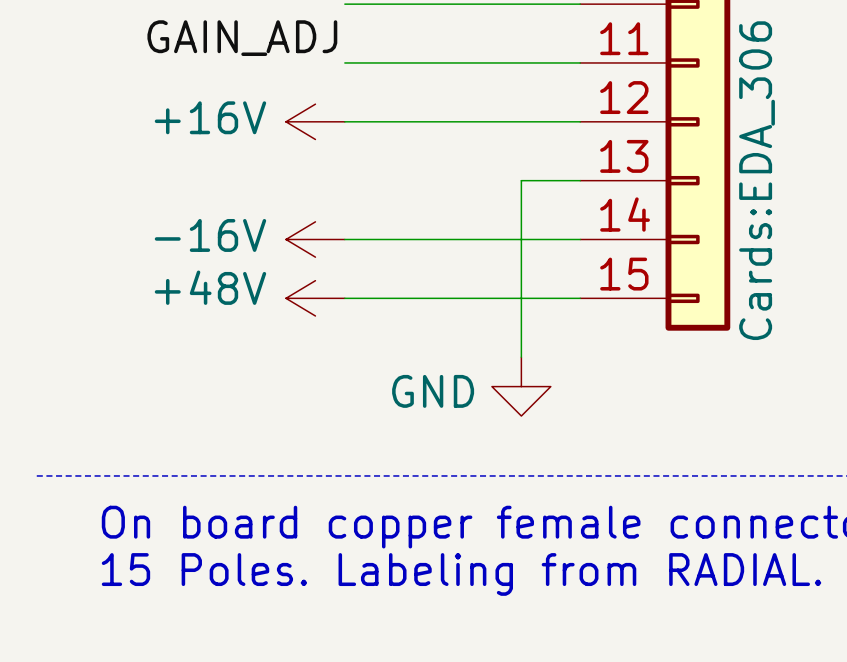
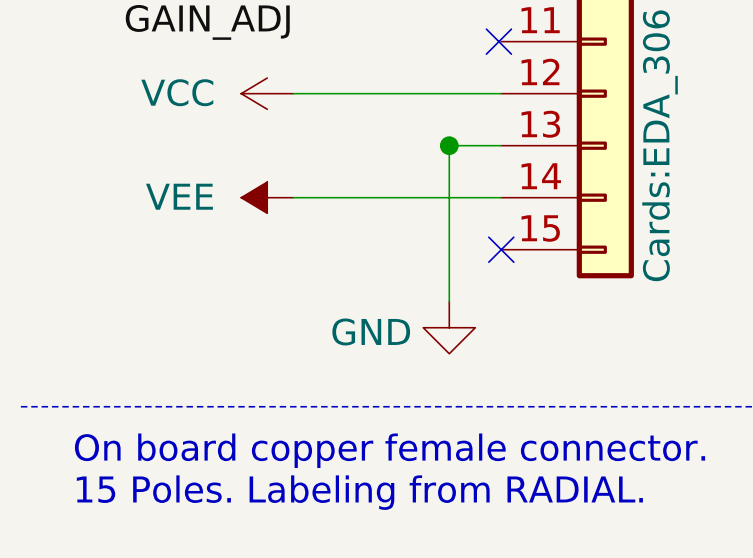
wire: (344, 62) (580, 62) -> none
no-connect mark: none -> (498, 41)
power symbol: +16V (315, 121) -> VCC (267, 93)
junction: none -> (449, 145)
power symbol: -16V (315, 239) -> VEE (267, 197)
power symbol: +48V (315, 298) -> none
wire: (344, 298) (580, 298) -> none
no-connect mark: none -> (501, 249)

